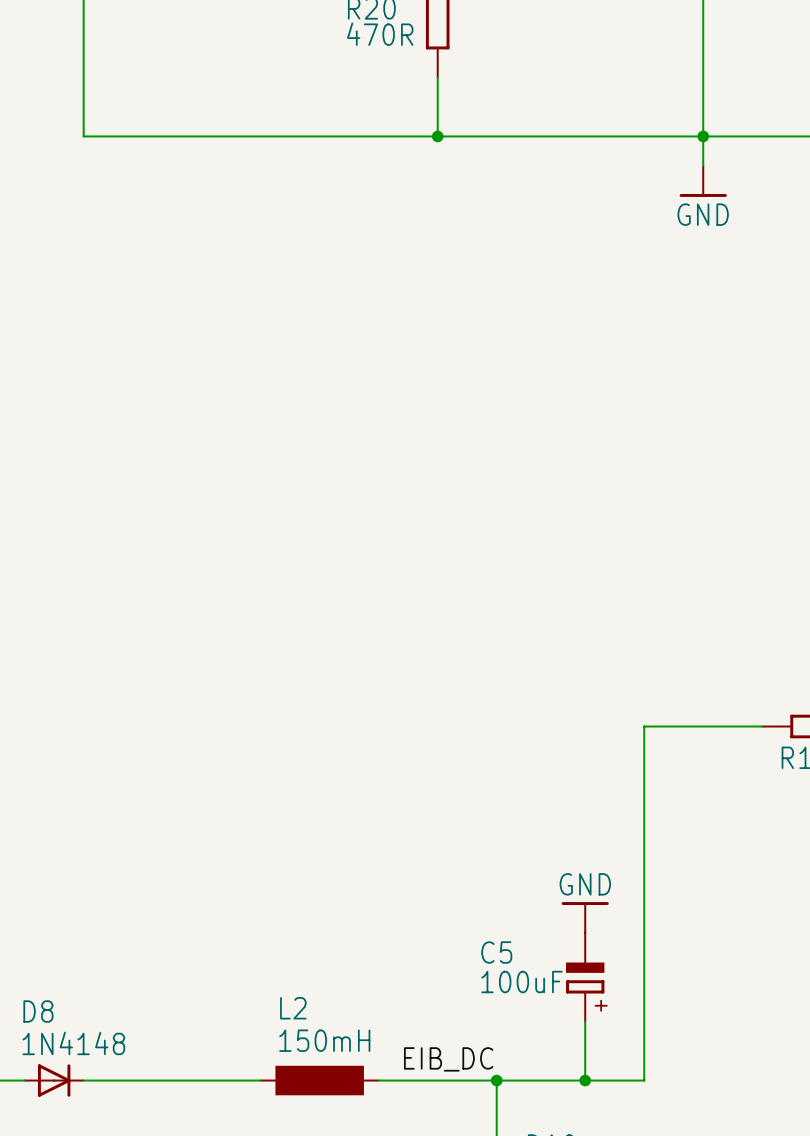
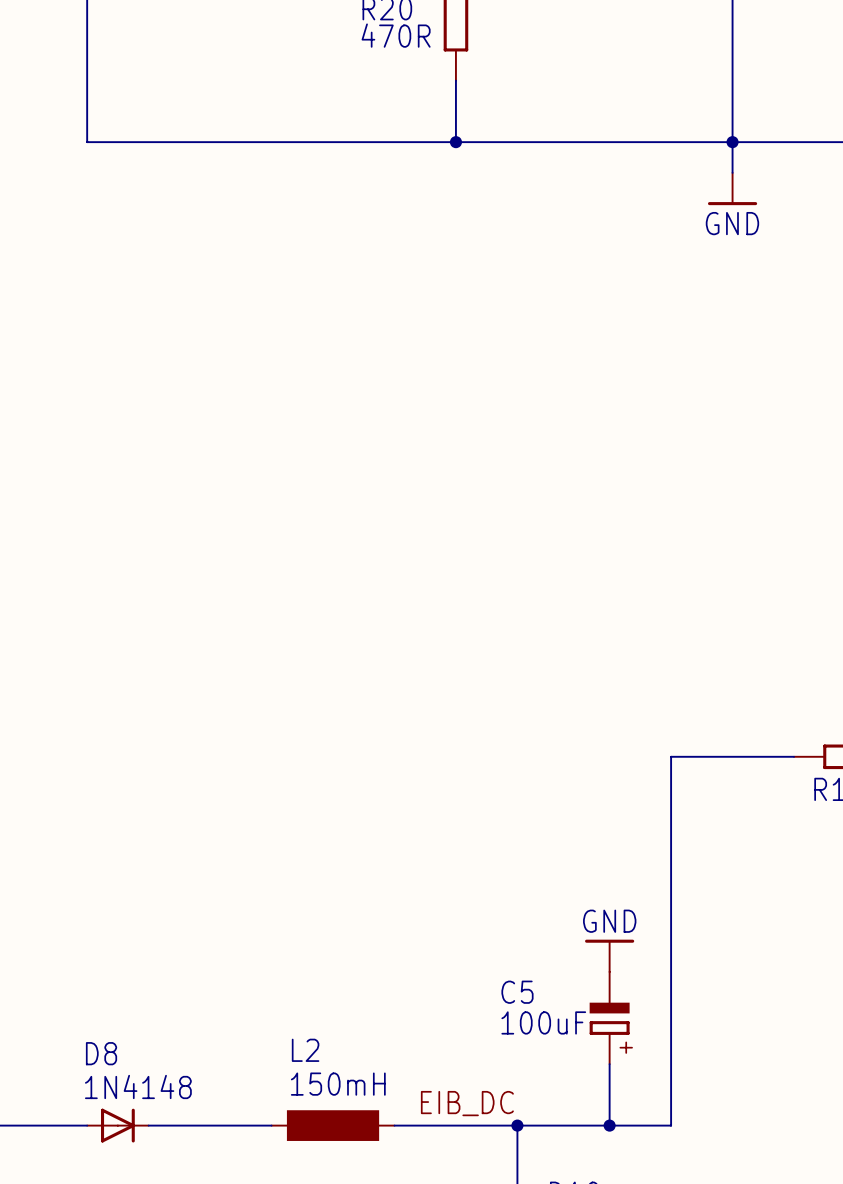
D8 position: (54, 1080) -> (117, 1125)

